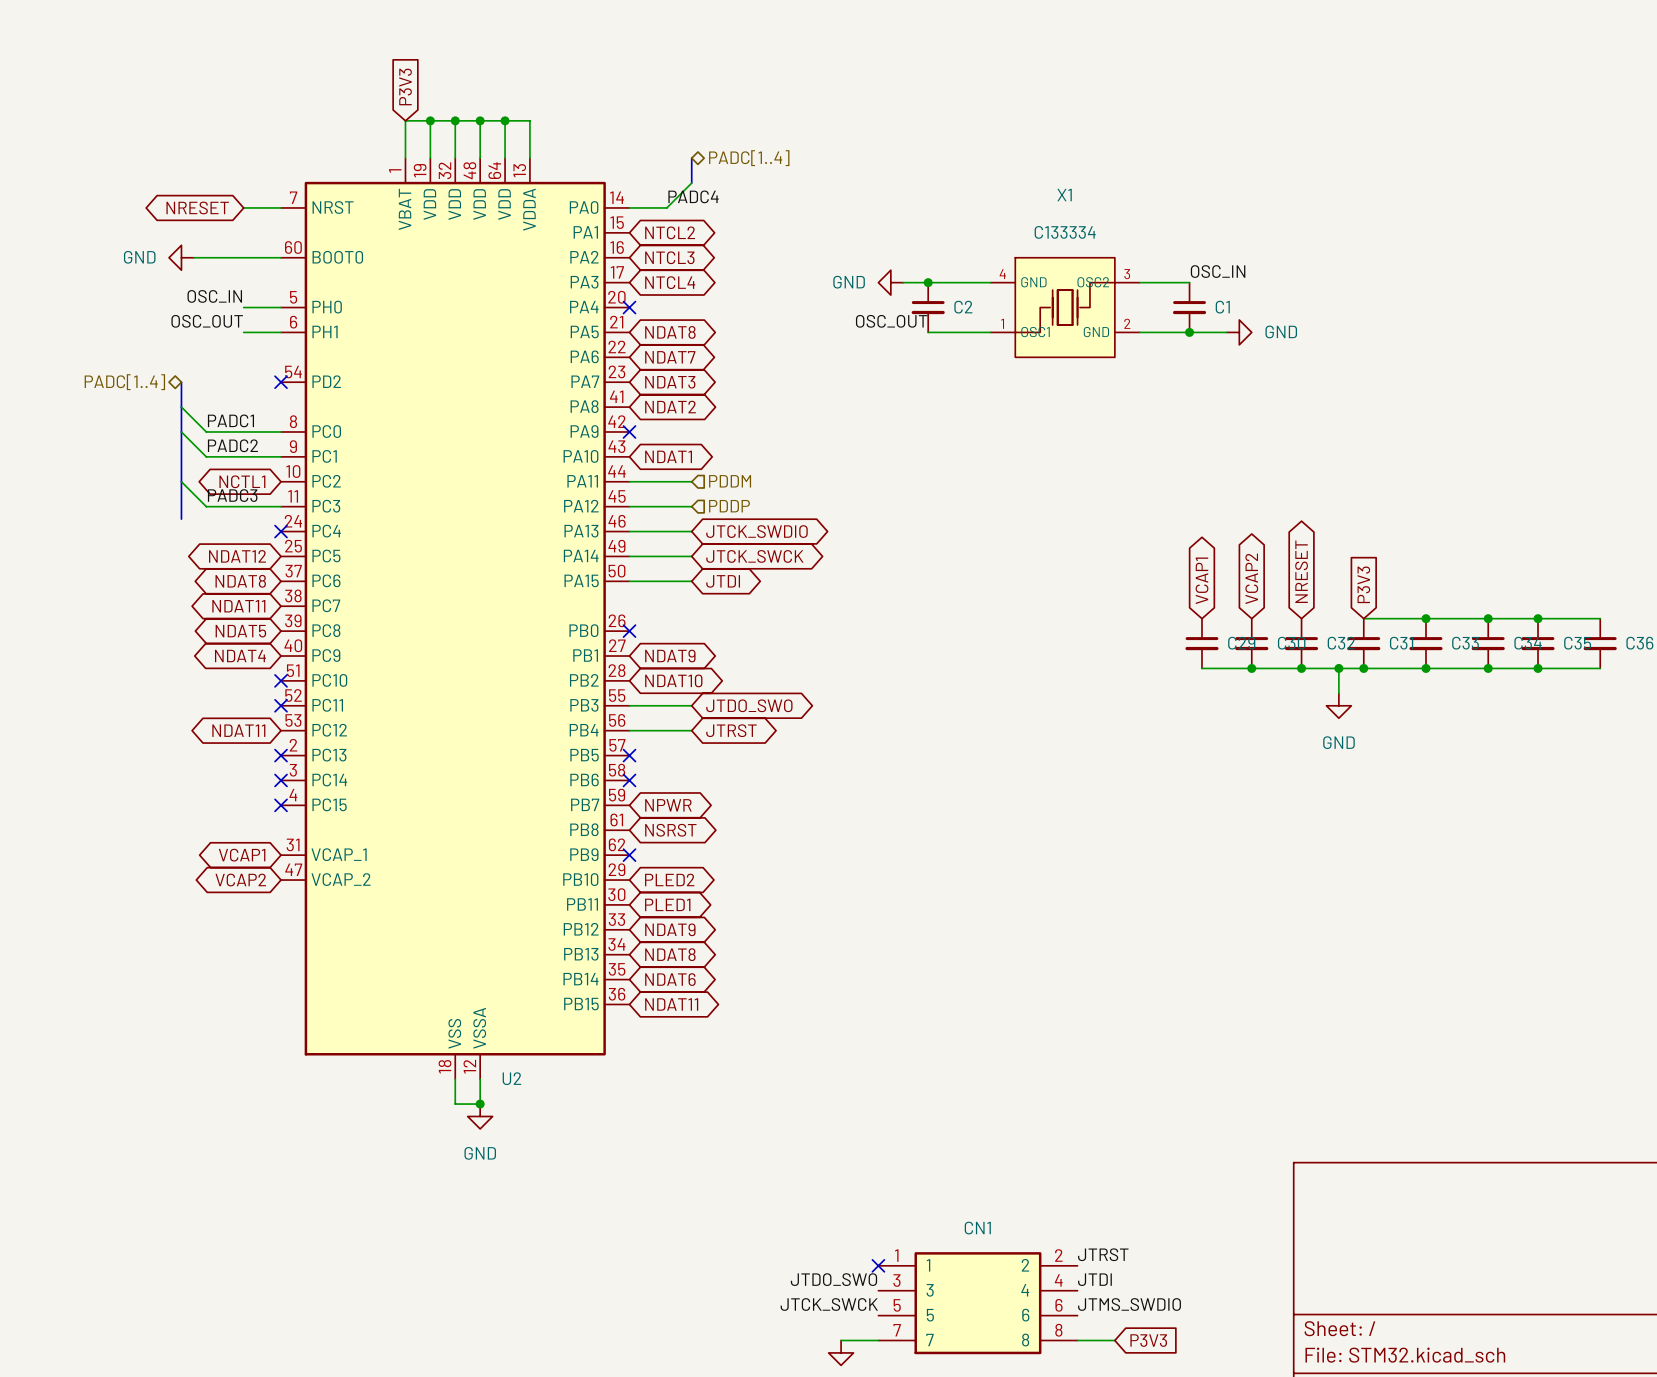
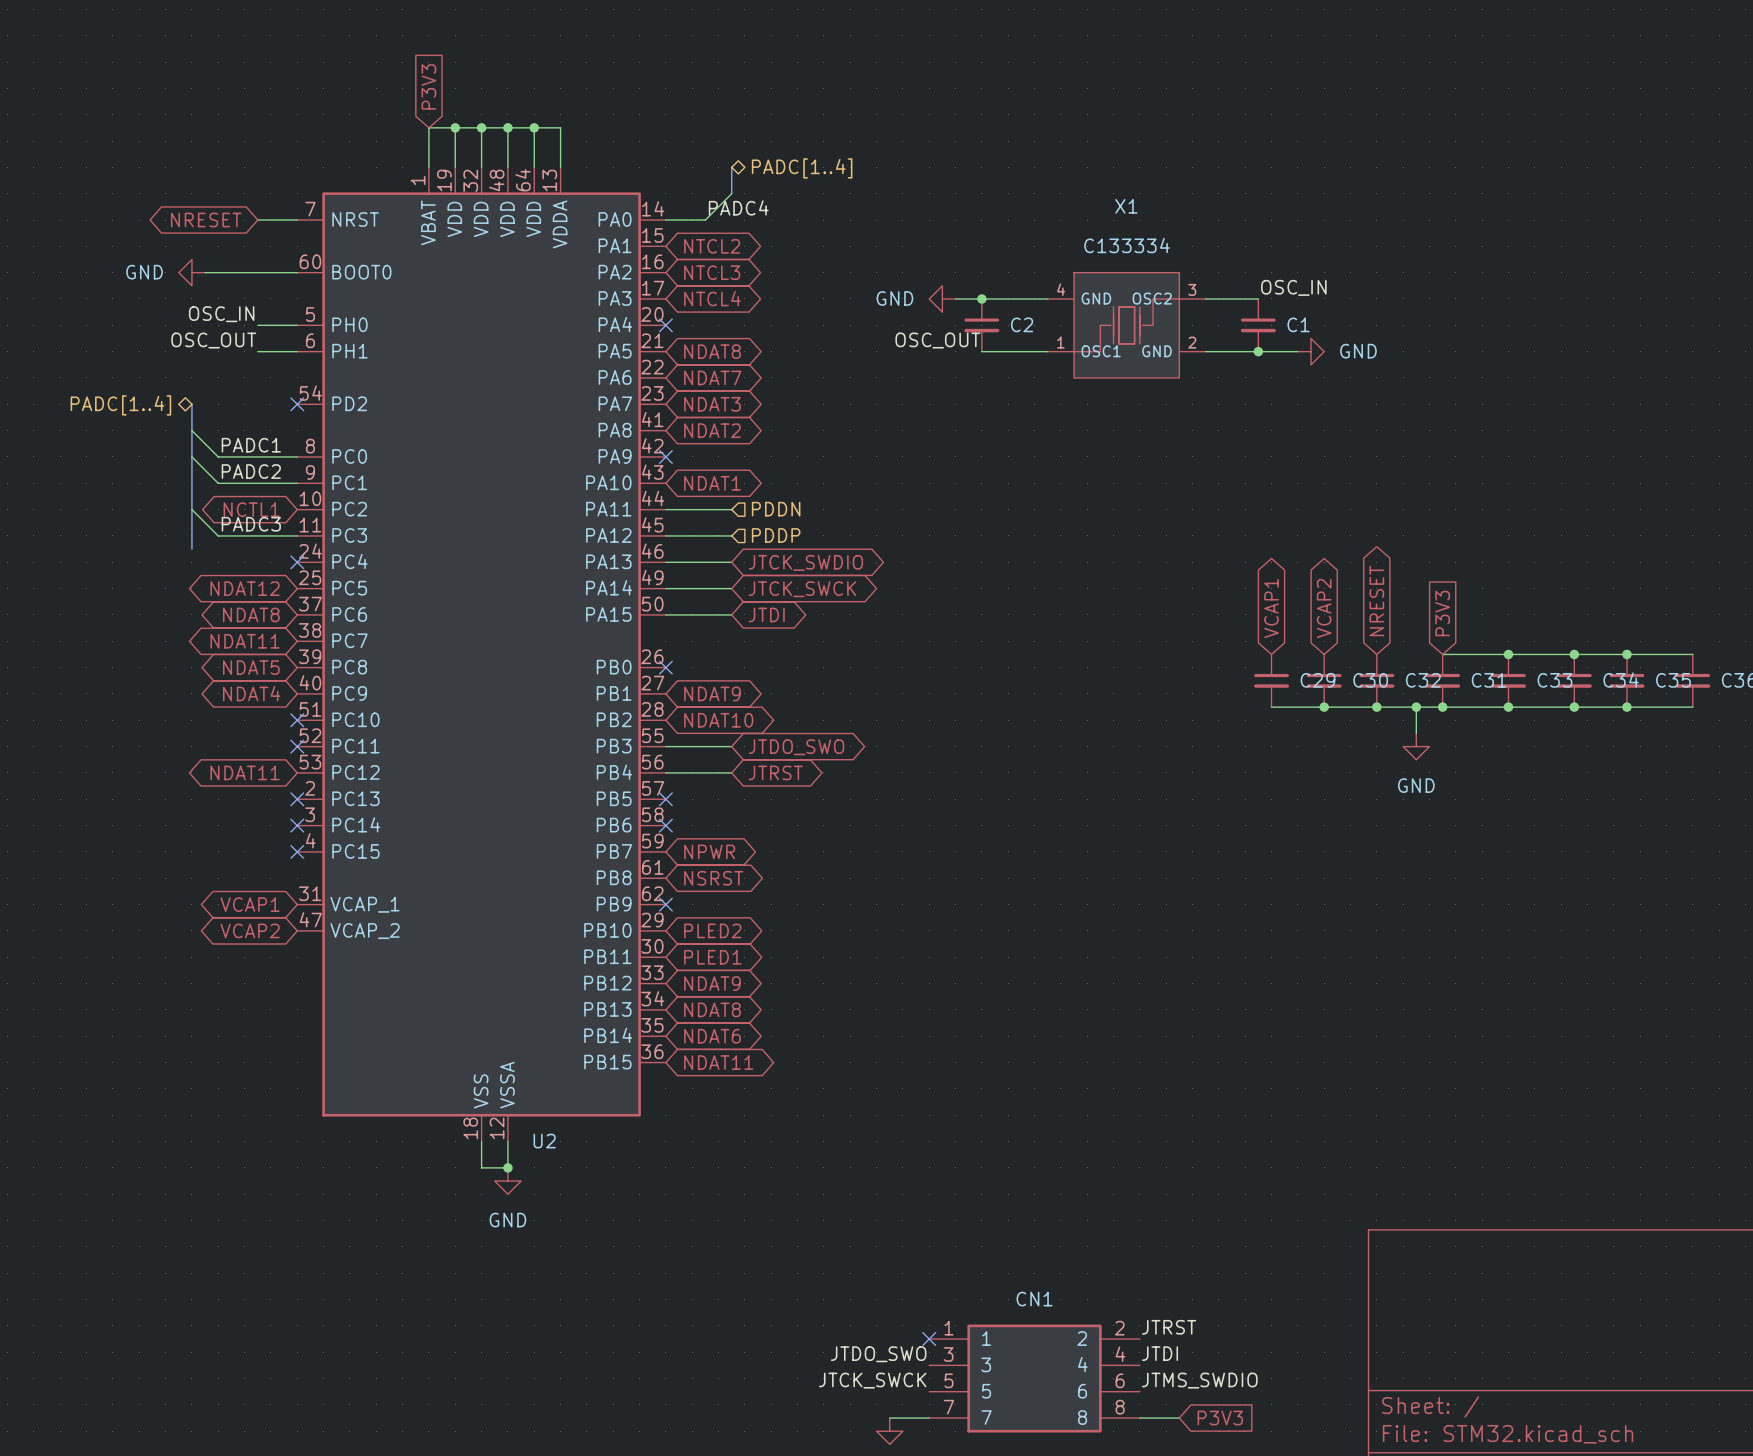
hierarchical label: PDDM (730, 481) -> PDDN (776, 509)

